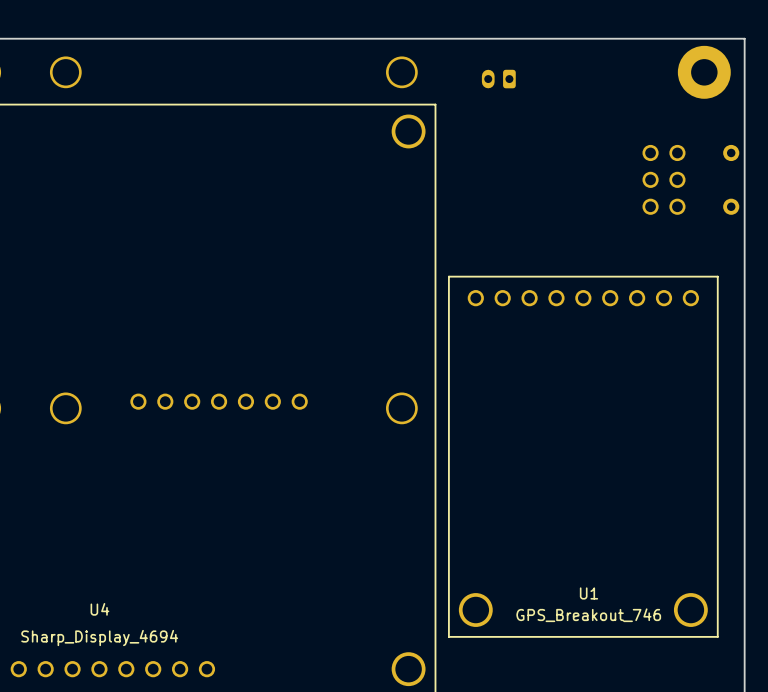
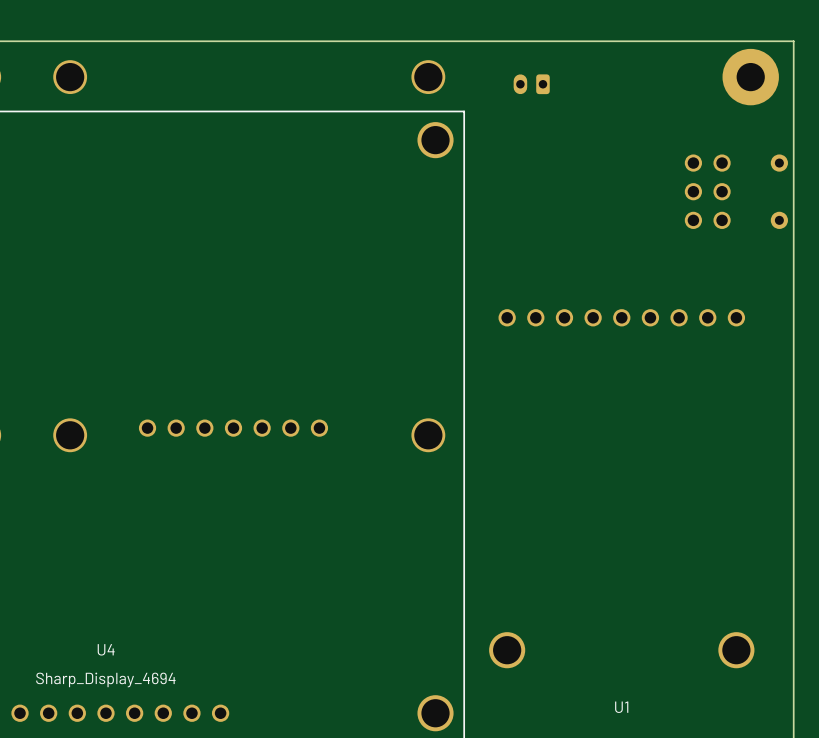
U1 footprint: [448, 276, 719, 638] -> [489, 309, 755, 669]
U1 name position: U1 (588, 593) -> U1 (621, 707)
U1 value: GPS_Breakout_746 (588, 615) -> none

